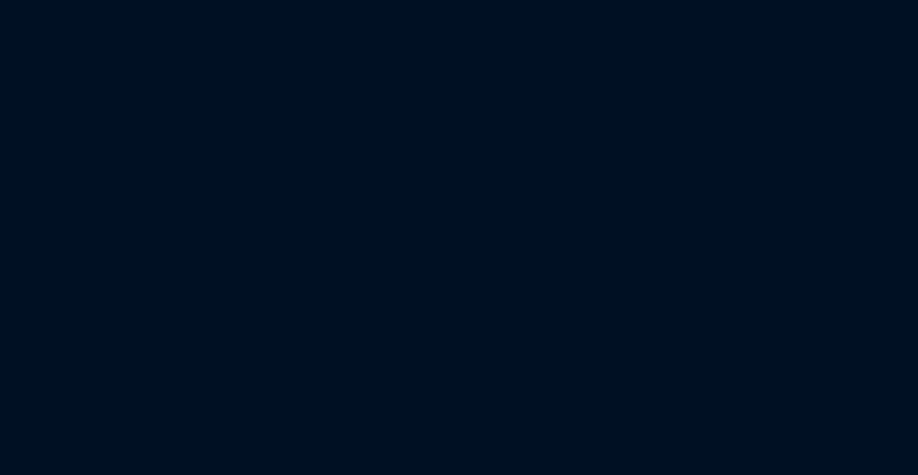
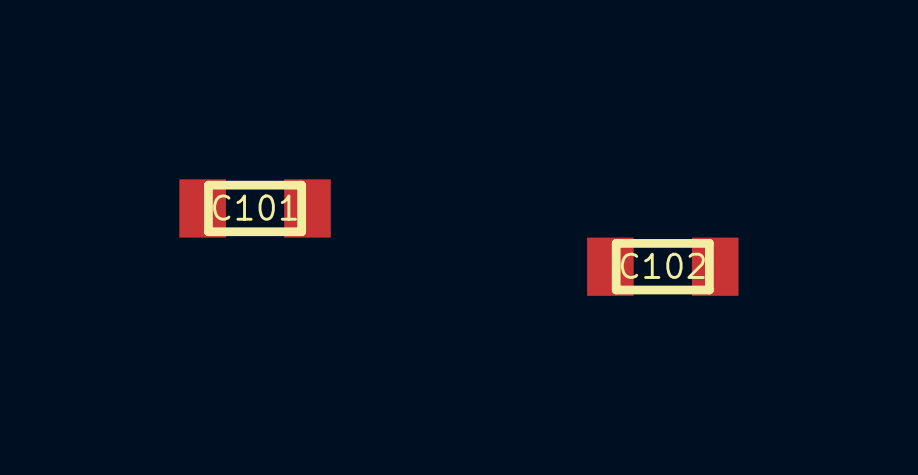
C101: none -> (255, 208)
C102: none -> (662, 266)

